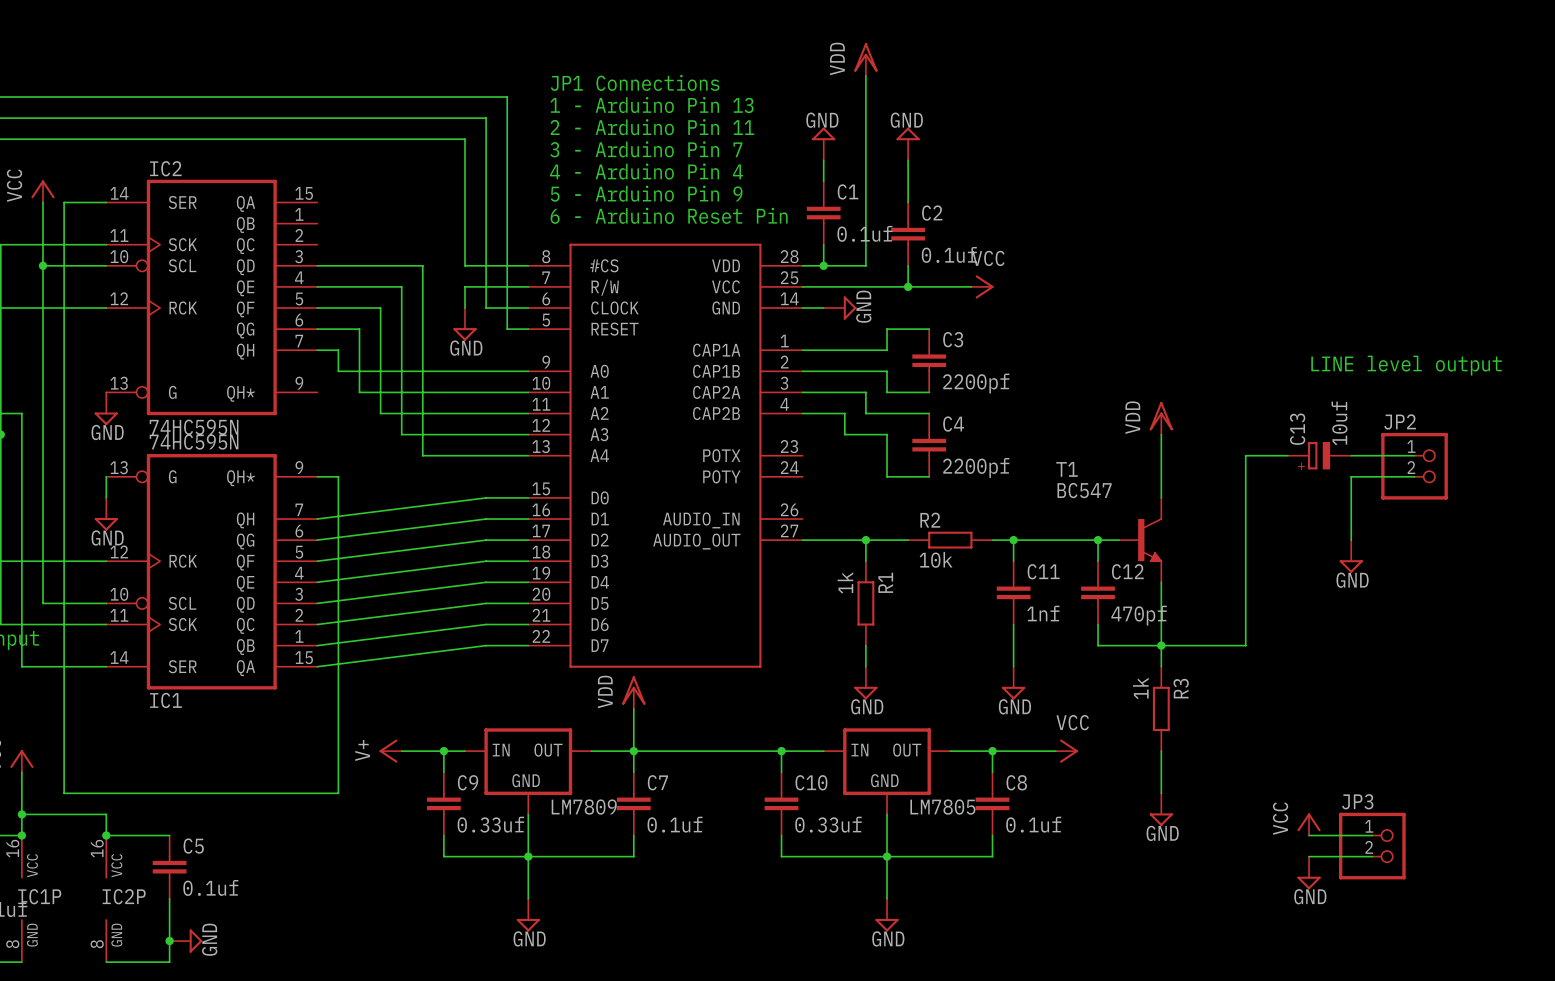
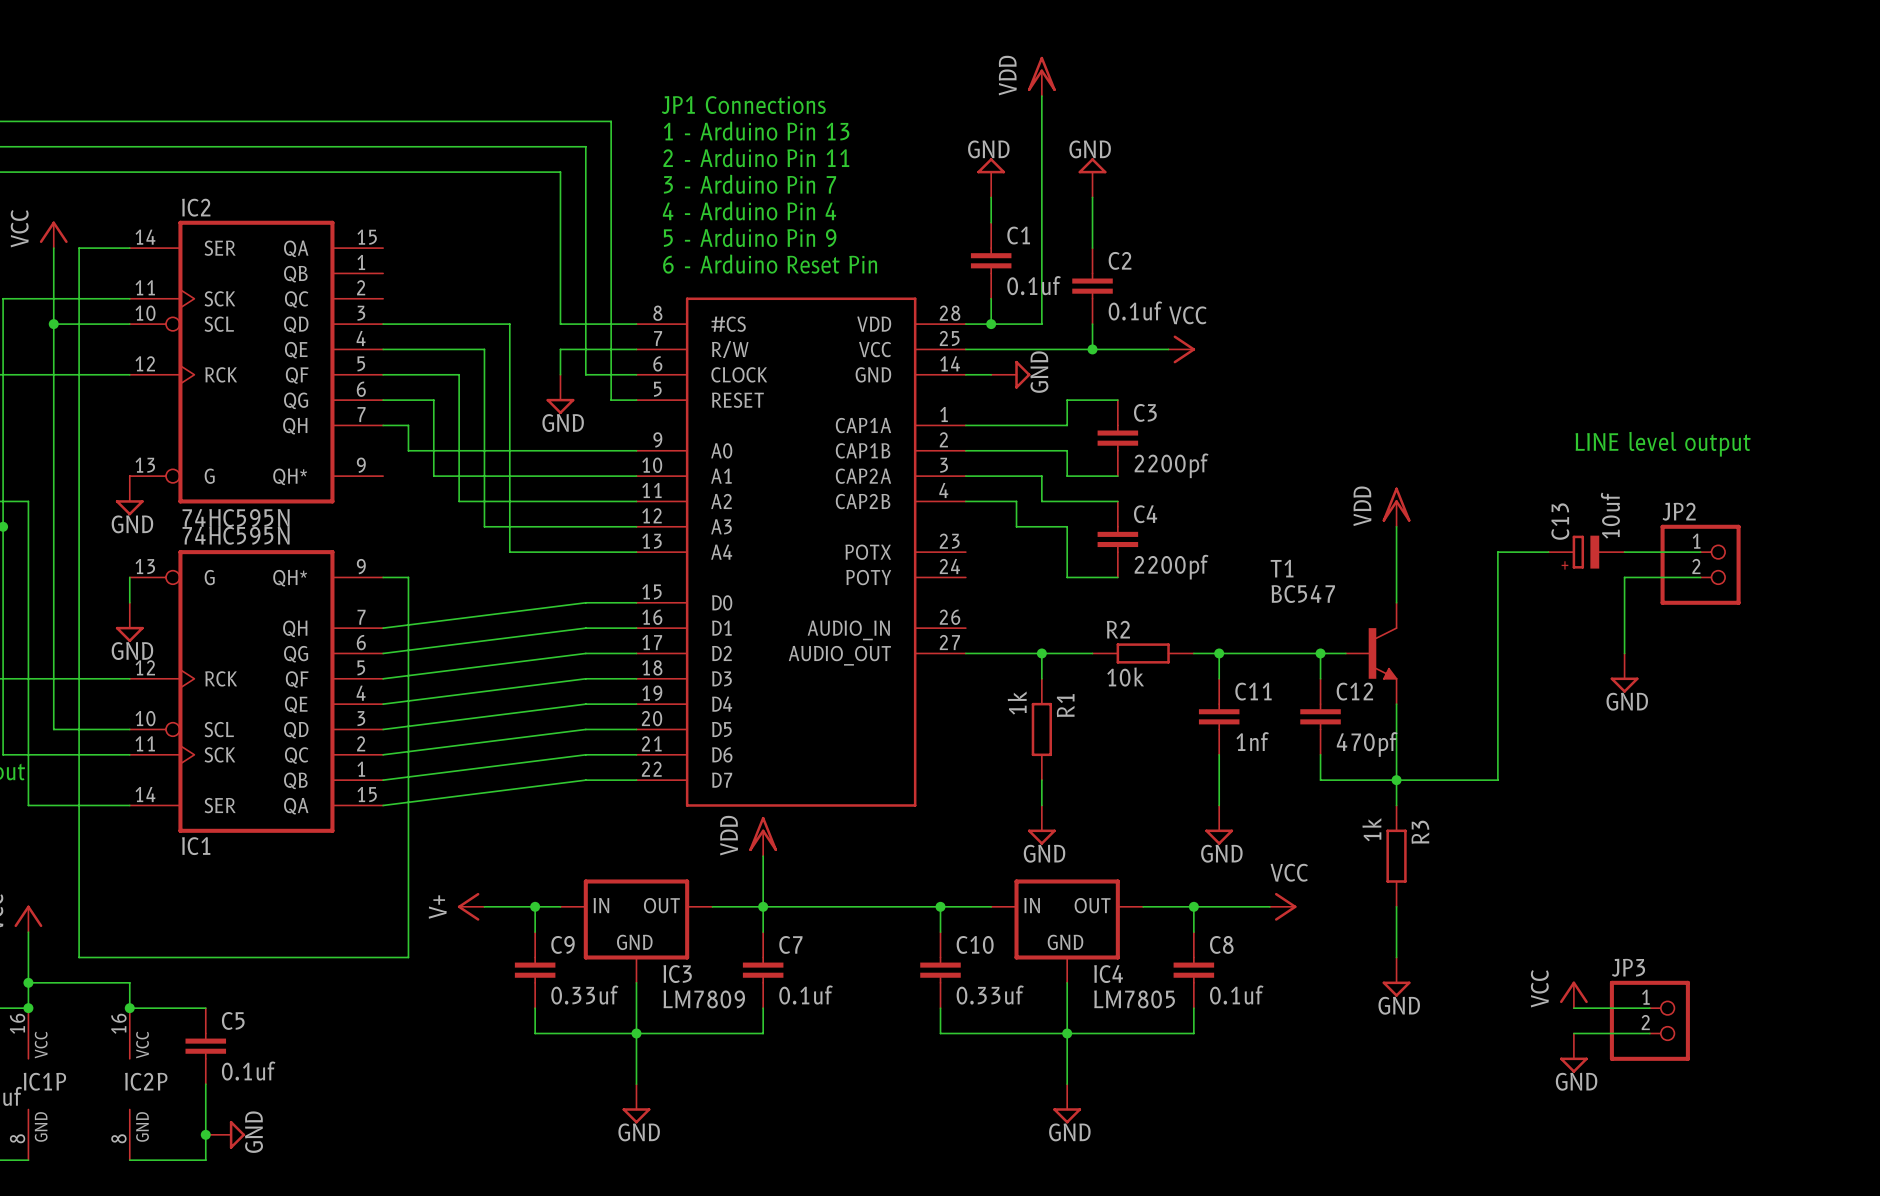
LM7809 name: LM7809 (584, 807) -> IC3 (677, 974)
LM7805 name: LM7805 (942, 807) -> IC4 (1108, 974)
LM7809 value: none -> LM7809 (704, 999)
LM7805 value: none -> LM7805 (1134, 999)

